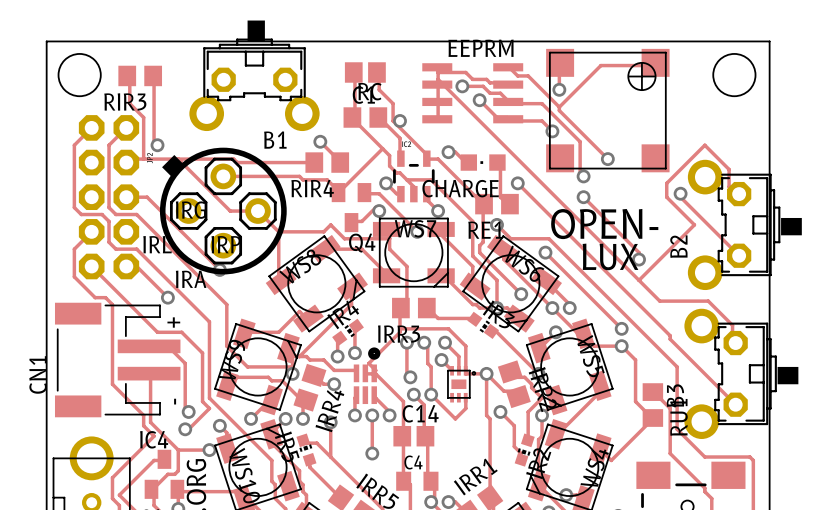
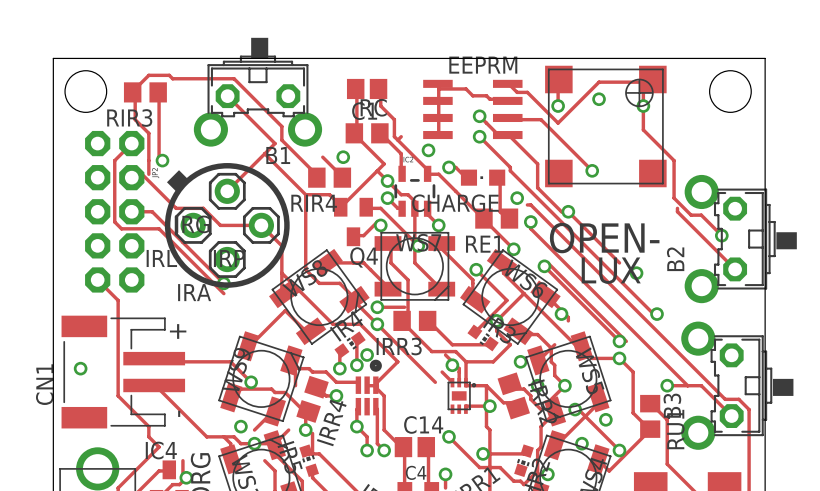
track: none -> (652, 79) (643, 82) (643, 129) (674, 160) (674, 198) (691, 215) (701, 215) (721, 235)
track: none -> (227, 96) (275, 143) (227, 191)
track: (438, 79) (479, 120) -> none
via: none -> (599, 99)
track: (462, 86) (483, 86) (490, 93) (500, 93) (508, 101) -> none
via: (462, 86) -> none
via: none -> (643, 106)
track: (559, 107) (559, 110) (607, 159) -> none
via: (400, 120) -> none
via: none -> (479, 136)
track: (510, 120) (542, 120) (552, 131) -> (510, 136) (537, 164) (537, 187) (561, 211) (568, 211) (619, 262)
track: (91, 127) (74, 145) (74, 207) (81, 214) (102, 214) (109, 221) (109, 242) (115, 249) (136, 249) (209, 321) (209, 398) (261, 450) -> none
via: (552, 131) -> none
via: none -> (428, 150)
via position: (320, 141) -> (343, 157)
track: (580, 141) (580, 172) (583, 176) -> (578, 157) (592, 170)
track: (382, 148) (389, 155) (389, 166) (396, 172) (400, 172) (406, 179) (431, 179) (472, 221) (472, 256) (496, 280) (496, 308) -> none
track: (510, 152) (659, 301) (708, 301) (732, 325) (732, 342) (735, 343) -> (510, 167) (510, 170) (653, 314) (657, 314)
track: none -> (377, 170) (401, 194) (408, 194)
via: none -> (592, 170)
track: (129, 159) (233, 159) (237, 162) (313, 162) -> (132, 92) (148, 75) (169, 75) (172, 78) (234, 78) (281, 126) (281, 140) (315, 174) (315, 177)
track: (178, 159) (230, 211) -> (138, 170) (176, 208) (203, 208) (220, 225) (234, 225)
via: (607, 159) -> none
via: none -> (387, 181)
track: (223, 176) (299, 176) -> (264, 153) (302, 191)
via: (583, 176) -> none
track: none -> (305, 194) (305, 269) (319, 283) (339, 283) (354, 299)
track: (517, 183) (670, 335) (670, 339) (704, 373) -> (667, 385) (701, 385)
via: (680, 193) -> none
track: (739, 194) (736, 193) (729, 186) (729, 169) (704, 145) (666, 183) (666, 197) (694, 224) (639, 280) -> none
via: none -> (568, 211)
track: (583, 197) (639, 252) (639, 259) -> none
via: (583, 197) -> none
track: (483, 204) (483, 242) (479, 245) (479, 252) (521, 294) -> (483, 218) (513, 249)
track: none -> (530, 221) (530, 228) (687, 385)
via: none -> (530, 221)
track: (136, 214) (226, 304) (226, 346) (247, 366) (292, 366) -> (142, 228) (159, 228) (223, 293)
via: none -> (721, 235)
track: (496, 224) (510, 238) (548, 238) (677, 366) (677, 429) (704, 457) (749, 457) (753, 460) -> (527, 204) (530, 204) (725, 399) (738, 399) (749, 409) (749, 470)
via: (496, 224) -> none
track: (91, 231) (74, 249) (74, 276) (95, 297) (105, 297) (112, 304) -> (118, 300) (118, 317)
track: (278, 231) (323, 231) (330, 224) (344, 238) (389, 238) -> none
via: none -> (513, 249)
track: none -> (547, 262) (626, 341)
track: none -> (476, 269) (506, 300) (474, 332)
via: none -> (476, 269)
track: (126, 266) (136, 266) (167, 297) -> none
track: (441, 275) (445, 276) (472, 304) (476, 304) (479, 308) (507, 308) (519, 318) -> (441, 289) (414, 262) (414, 208)
track: none -> (524, 293) (496, 320) (496, 331) (510, 344) (493, 361) (466, 361) (455, 351) (431, 351) (401, 320)
track: (112, 287) (157, 332) (181, 332) (202, 353) (202, 401) (209, 408) (188, 429) (185, 429) -> none
track: (351, 287) (351, 304) (299, 356) -> none
track: none -> (377, 307) (404, 307)
via: none -> (377, 307)
via: (521, 294) -> none
via: (167, 297) -> none
via: none -> (561, 314)
via: none -> (657, 314)
track: (400, 308) (400, 332) (368, 363) (375, 370) -> (281, 273) (333, 324) (360, 324) (397, 361) (377, 382)
via: (552, 308) -> none
via: (569, 308) -> none
via: none -> (377, 324)
track: (308, 318) (299, 311) (278, 332) (247, 332) -> (311, 331) (309, 334) (285, 310) (251, 344)
track: (438, 318) (474, 319) -> (438, 331) (448, 341)
track: none -> (518, 331) (520, 334) (537, 334) (551, 348) (551, 361) (554, 365) (554, 375) (564, 385) (547, 402) (554, 411)
track: (400, 328) (448, 328) -> none
track: (491, 331) (493, 328) (538, 373) -> none
track: (451, 332) (465, 346) (465, 349) -> (452, 344) (491, 343)
via: (555, 332) -> none
via: none -> (367, 355)
track: (406, 342) (406, 373) (410, 377) -> none
via: (406, 342) -> none
track: (424, 342) (427, 346) (427, 363) -> (353, 300) (428, 375)
via: (424, 342) -> none
via: (445, 342) -> none
track: (171, 349) (185, 363) (185, 408) -> (155, 385) (189, 419)
track: none -> (176, 361) (230, 361) (251, 382)
via: none -> (520, 361)
via: none -> (452, 365)
via: none -> (80, 368)
via: (441, 360) -> none
track: (431, 366) (431, 394) (455, 418) (465, 408) (465, 397) -> (431, 378) (435, 382)
via: none -> (251, 382)
track: (150, 373) (150, 422) (178, 450) (209, 450) -> none
via: (292, 373) -> none
track: (375, 373) (403, 401) (403, 436) -> (377, 385) (377, 389) (384, 395) (384, 430) (403, 447)
via: (486, 373) -> none
via: none -> (564, 385)
via: none -> (667, 385)
via: (410, 377) -> none
track: (413, 394) (424, 405) (425, 436) -> none
via: (413, 394) -> none
via: (431, 394) -> none
track: none -> (489, 406) (466, 406) (465, 409)
via: none -> (489, 406)
track: (375, 398) (389, 411) (389, 415) -> (377, 409) (377, 443) (384, 450)
track: (542, 398) (528, 411) (527, 440) -> (483, 453) (524, 453) (527, 451)
track: none -> (575, 409) (578, 409) (619, 450)
via: none -> (575, 409)
via: none -> (605, 419)
track: none -> (193, 423) (206, 436) (234, 436) (240, 443) (274, 445)
via: (188, 411) -> none
track: (500, 411) (514, 425) (514, 446) (521, 453) (521, 459) -> none
via: (500, 411) -> none
via: none -> (240, 426)
track: none -> (356, 426) (367, 436) (367, 450)
track: (372, 415) (372, 453) -> none
via: (372, 415) -> none
via: (389, 415) -> none
via: (542, 415) -> none
via: (251, 418) -> none
via: (285, 418) -> none
track: none -> (312, 433) (312, 453) (306, 451)
track: (330, 422) (330, 457) -> none
via: (330, 422) -> none
via: (219, 425) -> none
track: none -> (448, 436) (479, 467) (500, 467) (513, 481) (520, 481) (524, 484) (534, 474) (547, 474)
via: none -> (448, 436)
via: (185, 429) -> none
via: none -> (254, 443)
via: none -> (581, 443)
via: none -> (367, 450)
via: none -> (384, 450)
via: none -> (619, 450)
via: none -> (483, 453)
via: (209, 450) -> none
via: (372, 453) -> none
track: none -> (445, 474) (445, 488)
via: none -> (445, 474)
via: none -> (547, 474)
via: none -> (186, 477)

